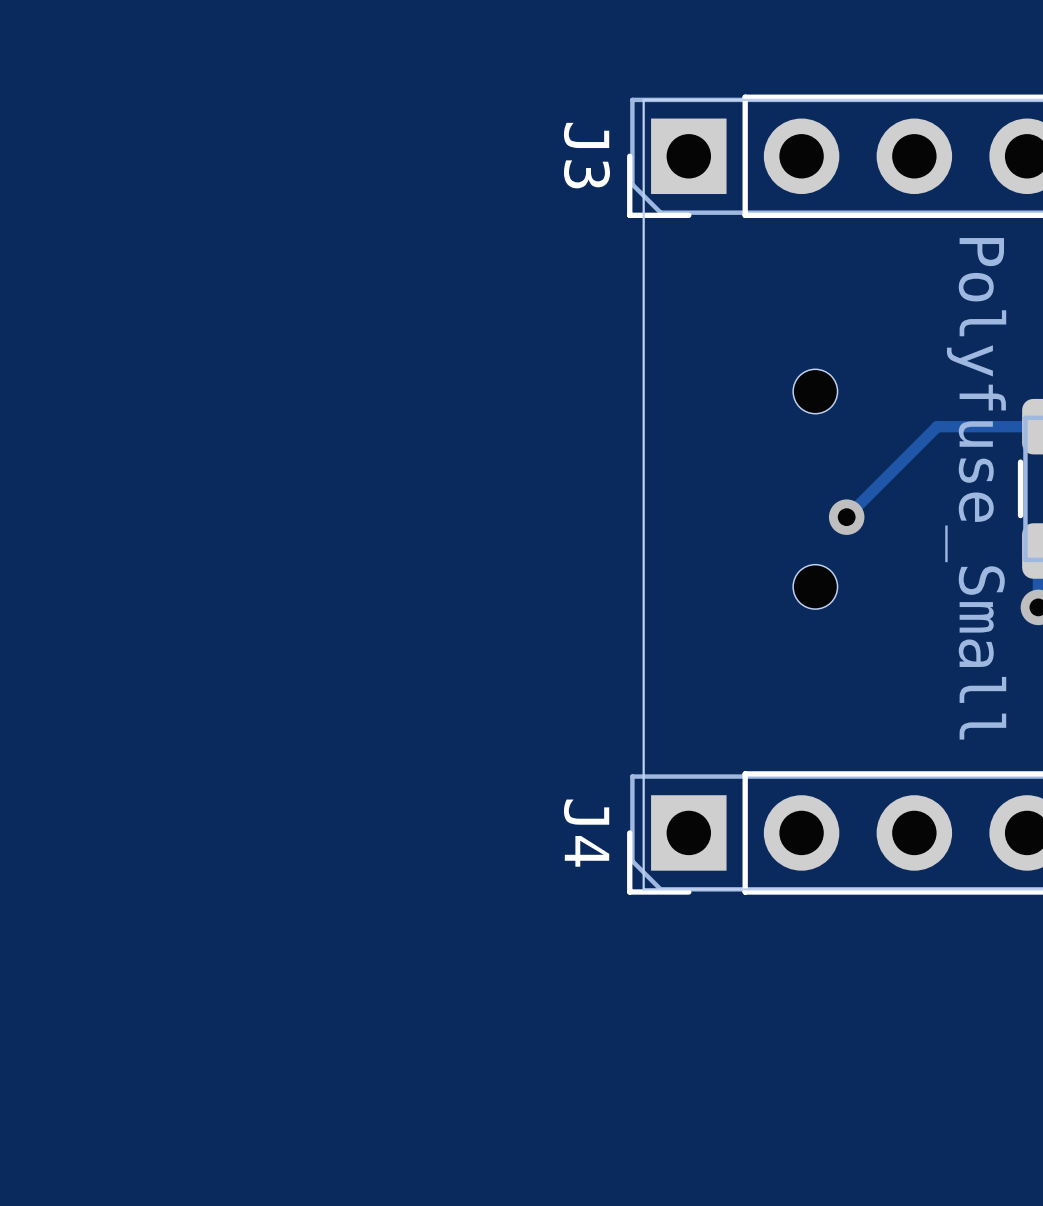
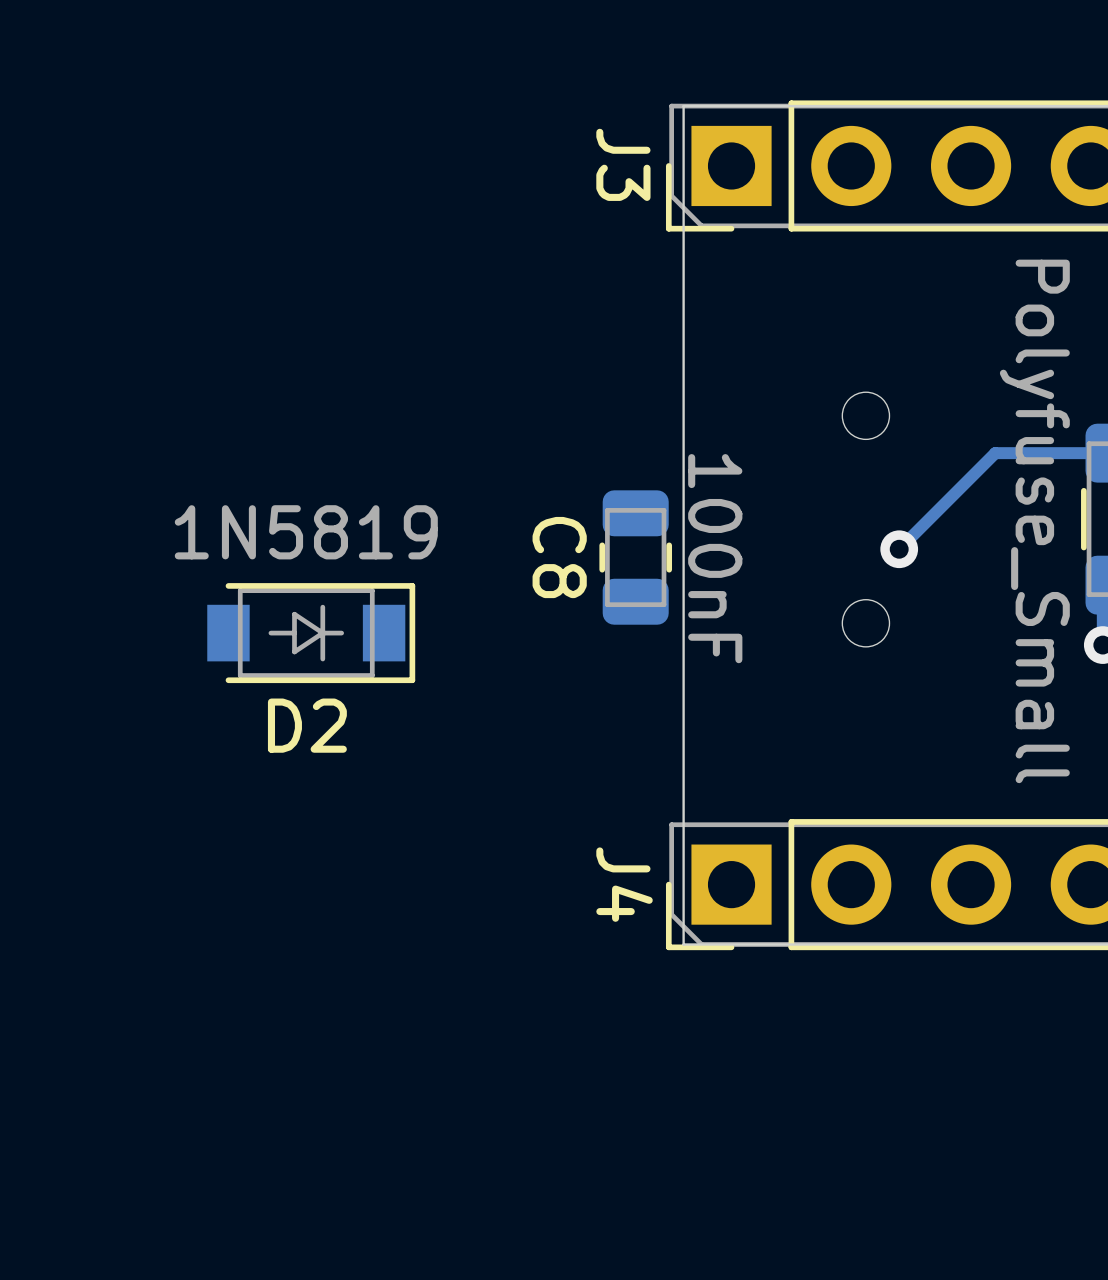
C8: none -> 100nF (635, 557)
D2: none -> 1N5819 (311, 633)

